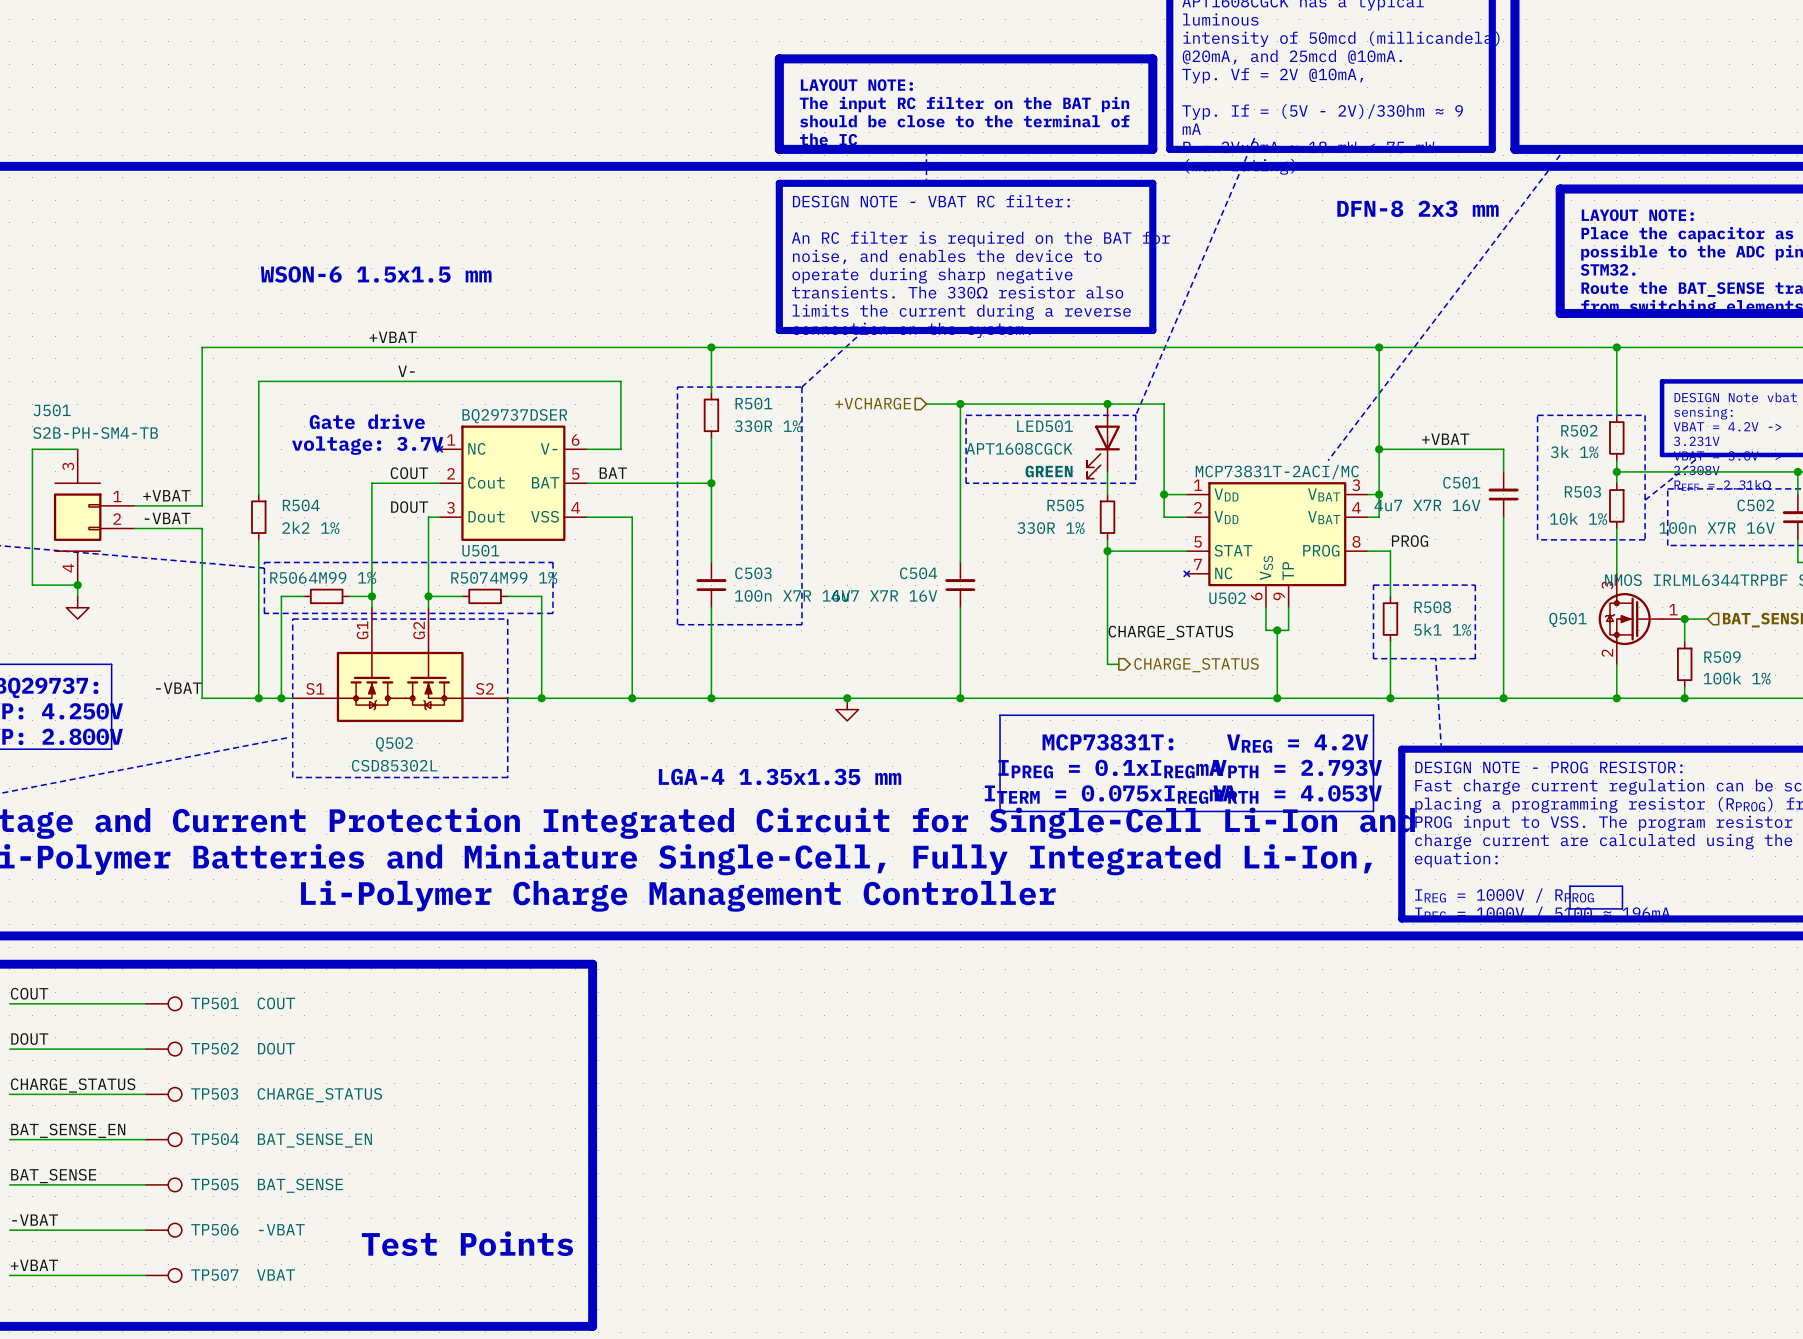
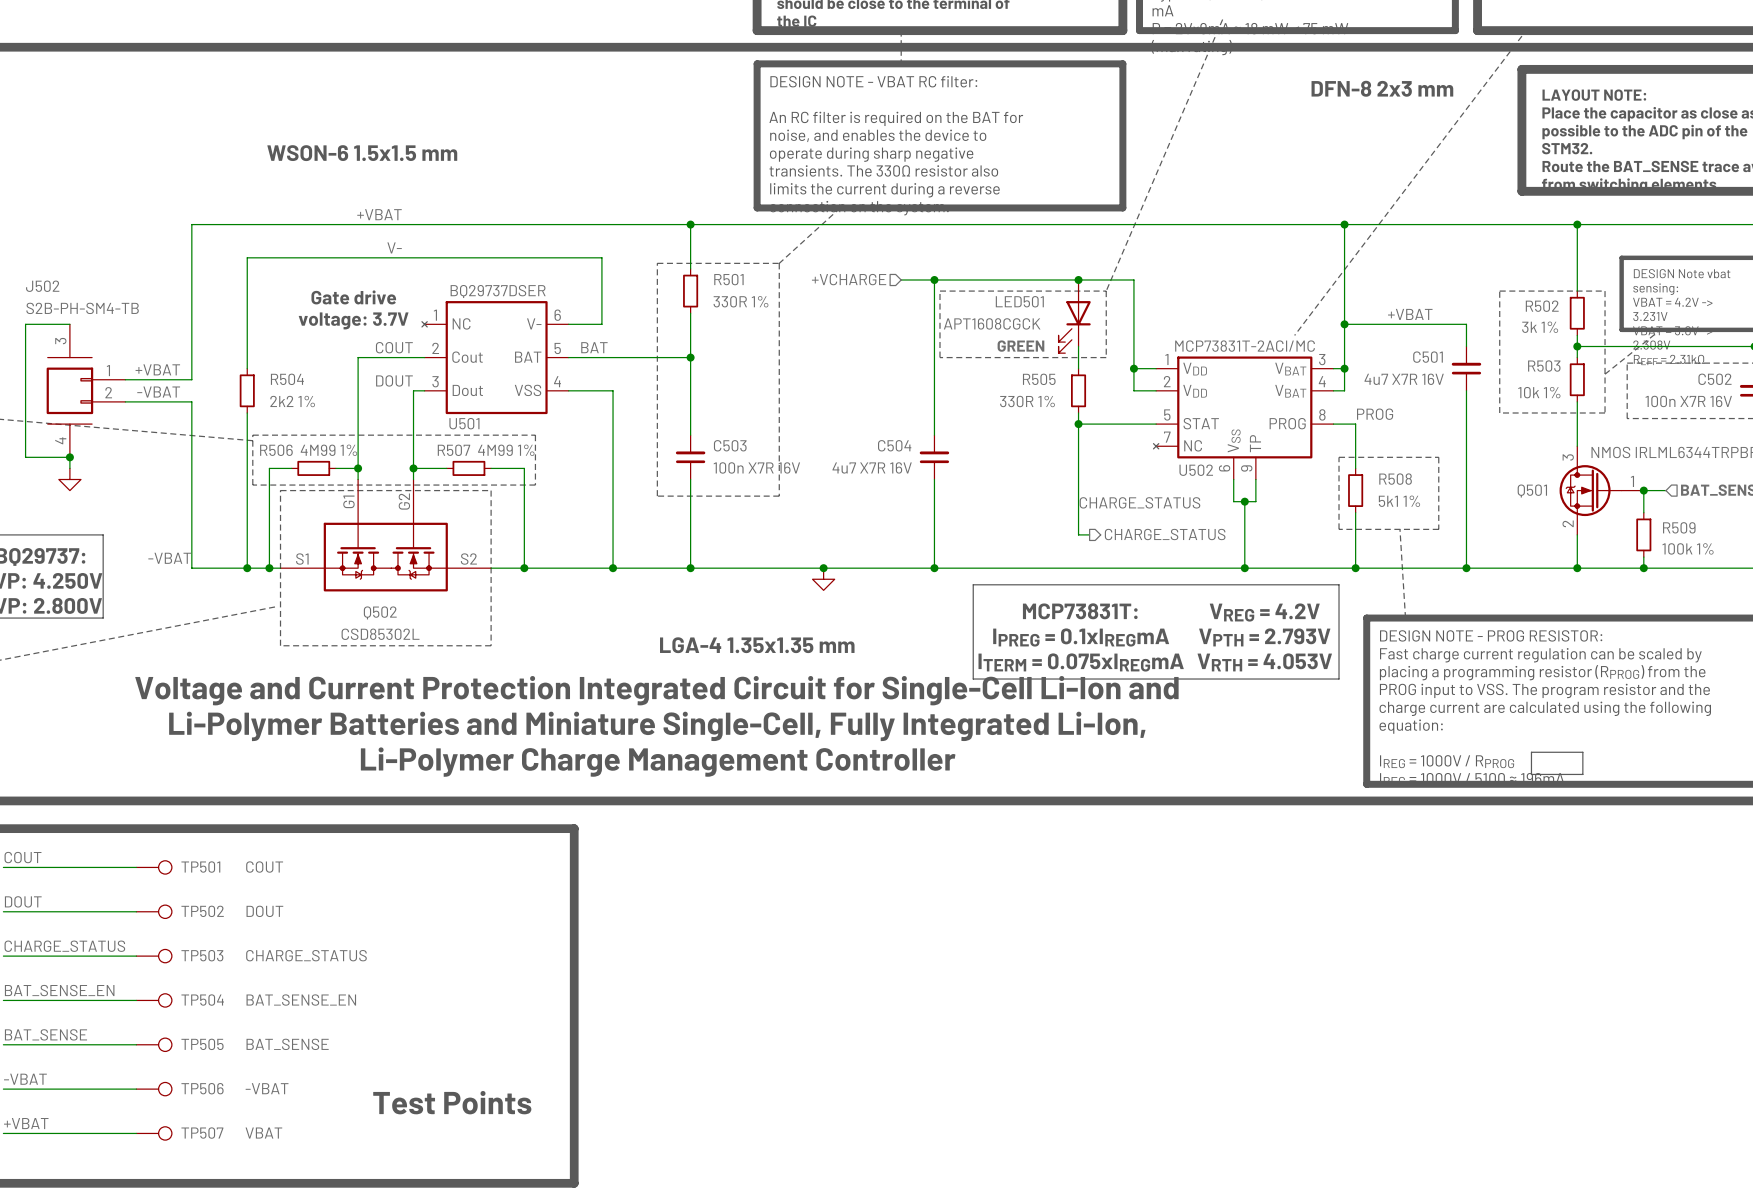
J501 name: J501 (52, 410) -> J502 (42, 286)

